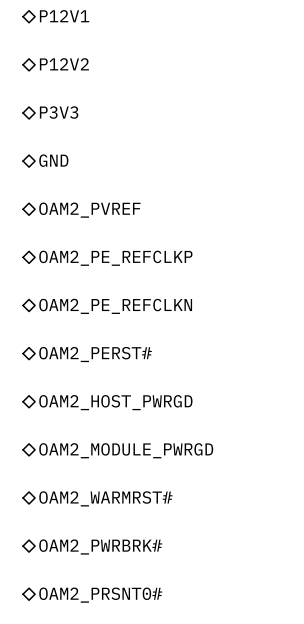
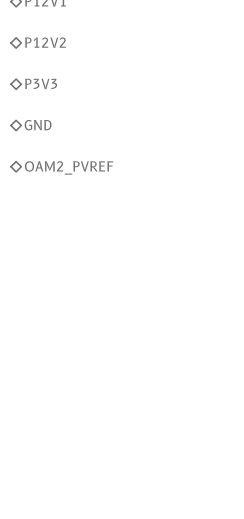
hierarchical label: OAM2_PE_REFCLKP (115, 258) -> none
hierarchical label: OAM2_PE_REFCLKN (115, 306) -> none
hierarchical label: OAM2_PERST# (95, 354) -> none
hierarchical label: OAM2_HOST_PWRGD (115, 402) -> none
hierarchical label: OAM2_MODULE_PWRGD (126, 450) -> none
hierarchical label: OAM2_WARMRST# (105, 498) -> none
hierarchical label: OAM2_PWRBRK# (100, 547) -> none
hierarchical label: OAM2_PRSNT0# (100, 595) -> none

